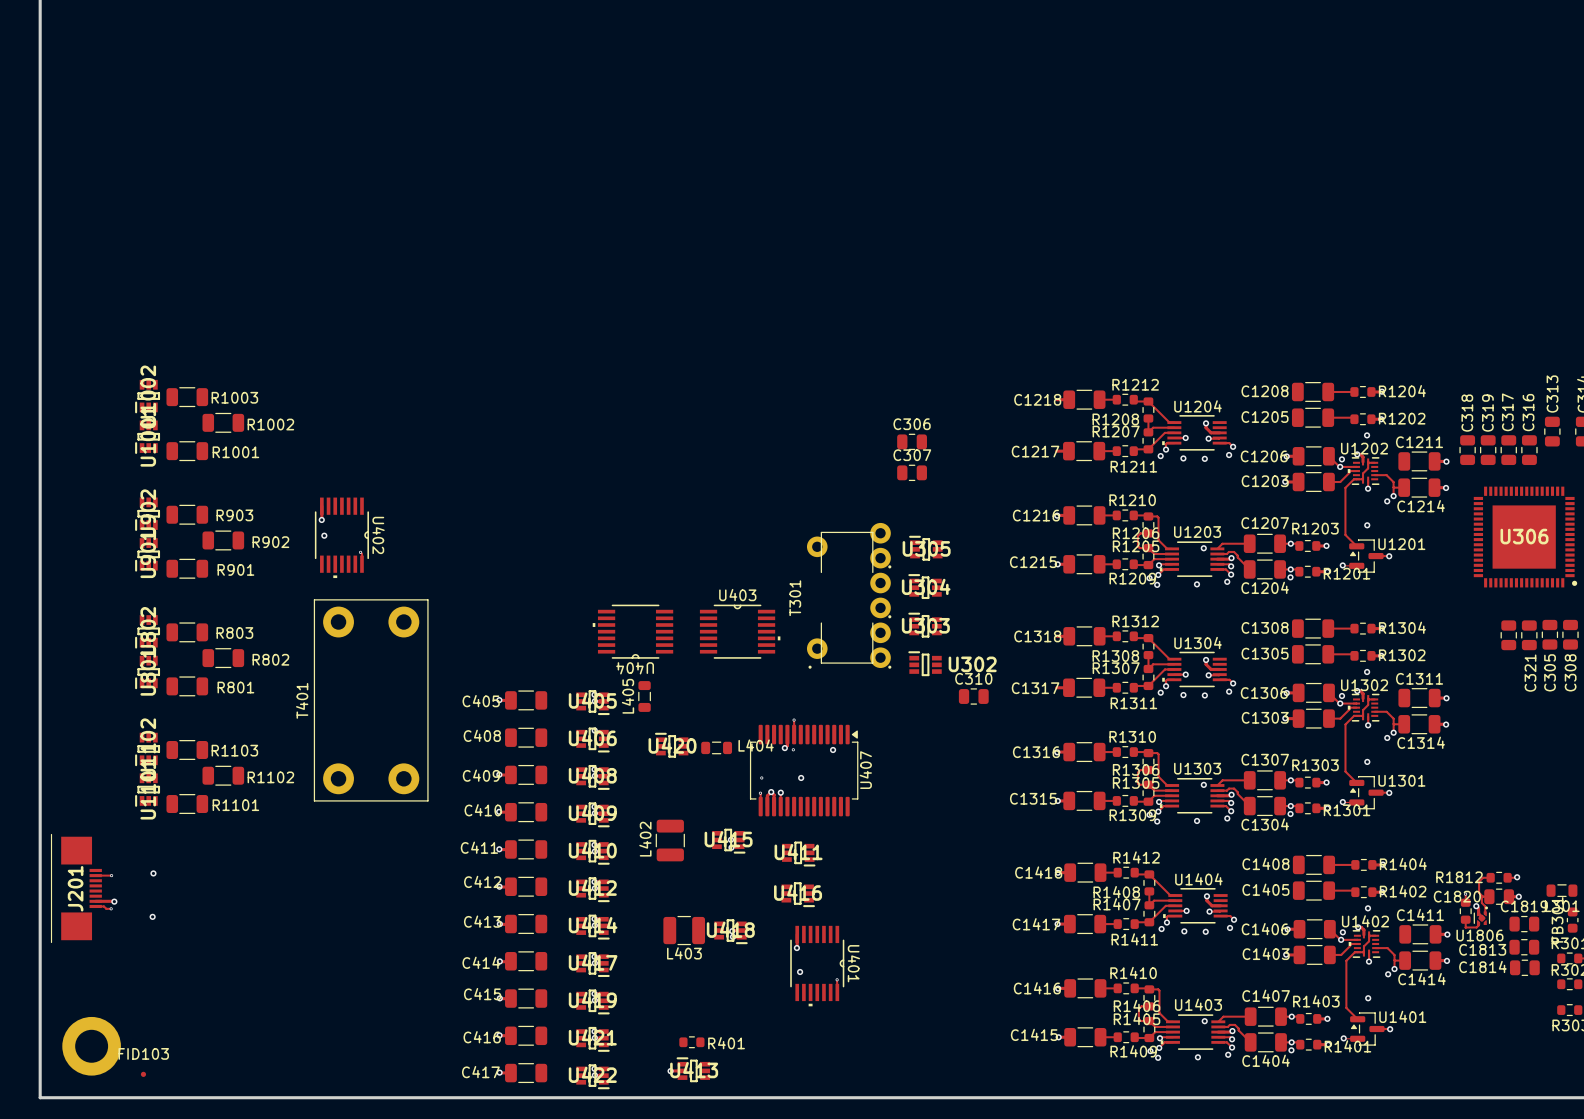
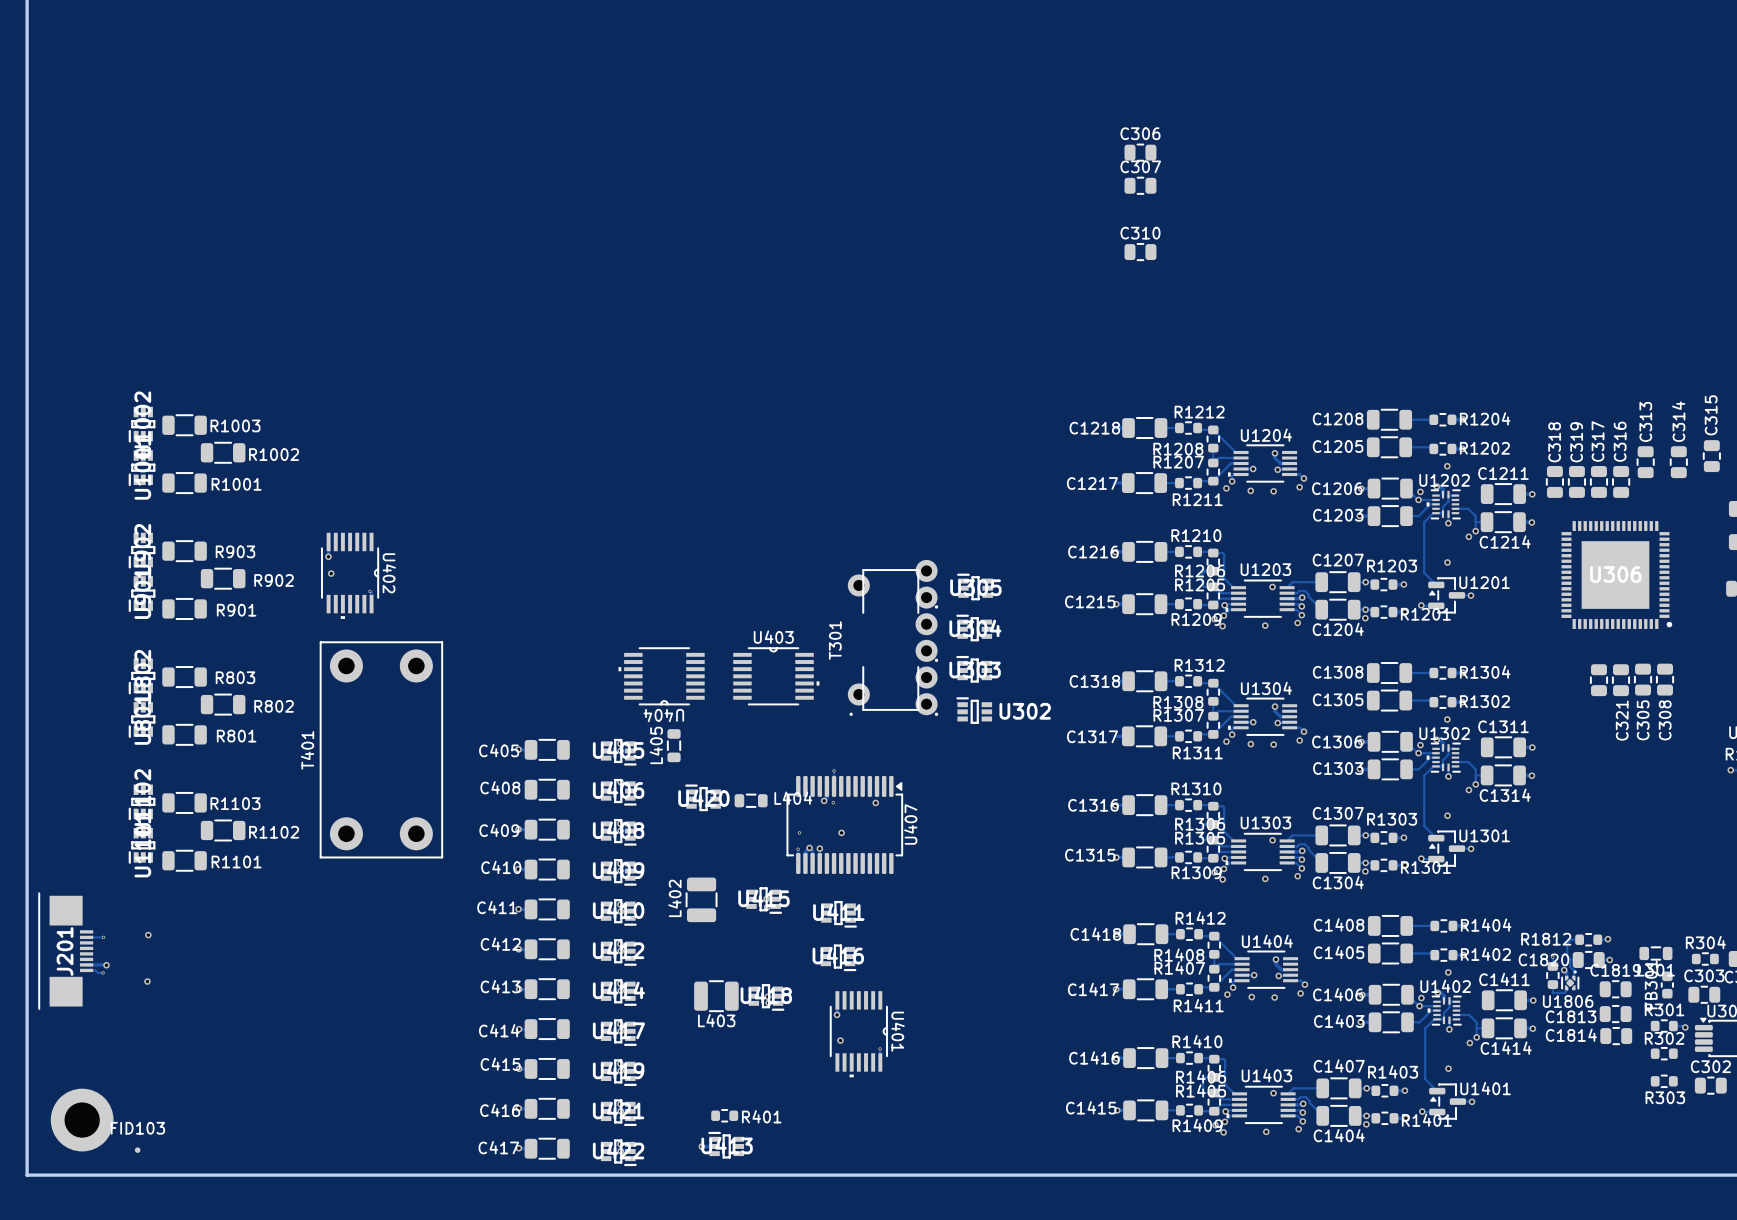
C306 position: (912, 441) -> (1140, 152)
C307 position: (912, 472) -> (1140, 185)
C310 position: (973, 696) -> (1140, 252)

